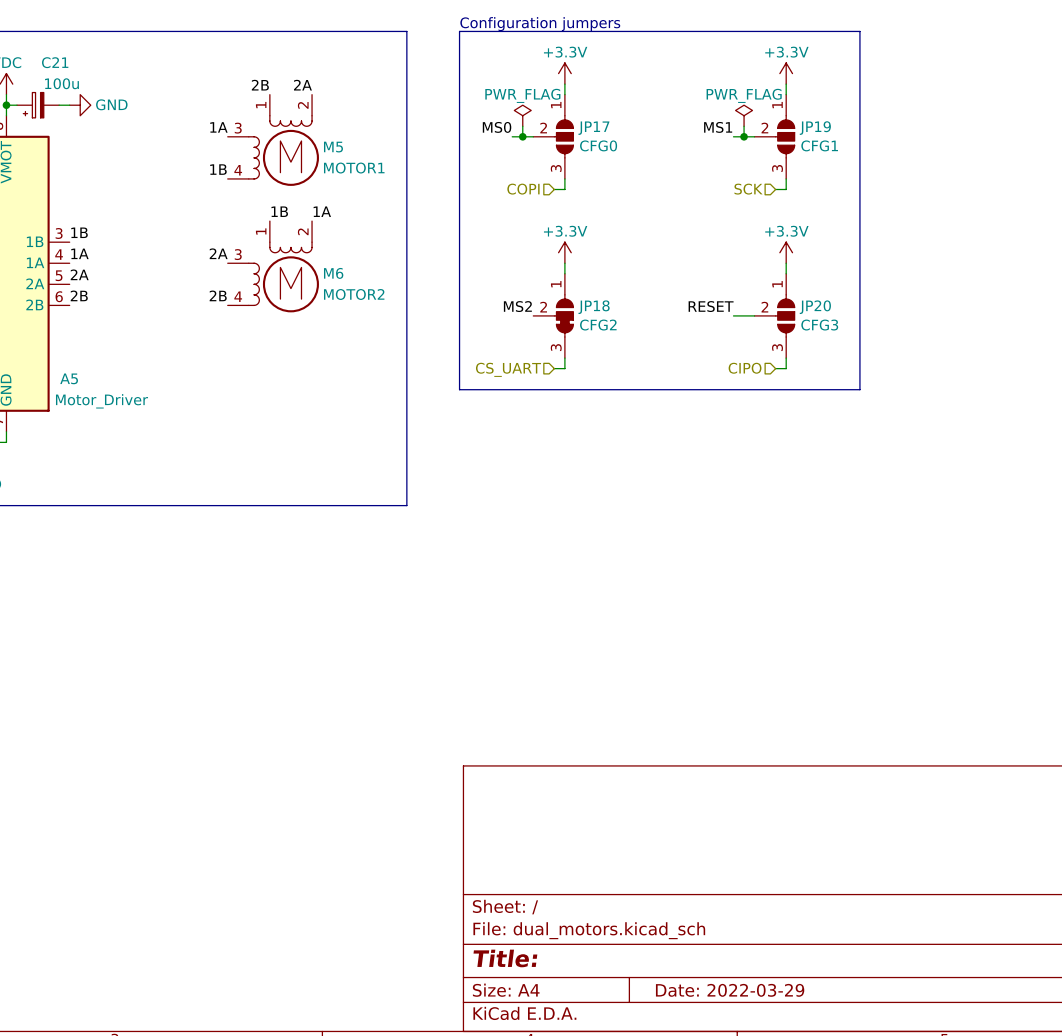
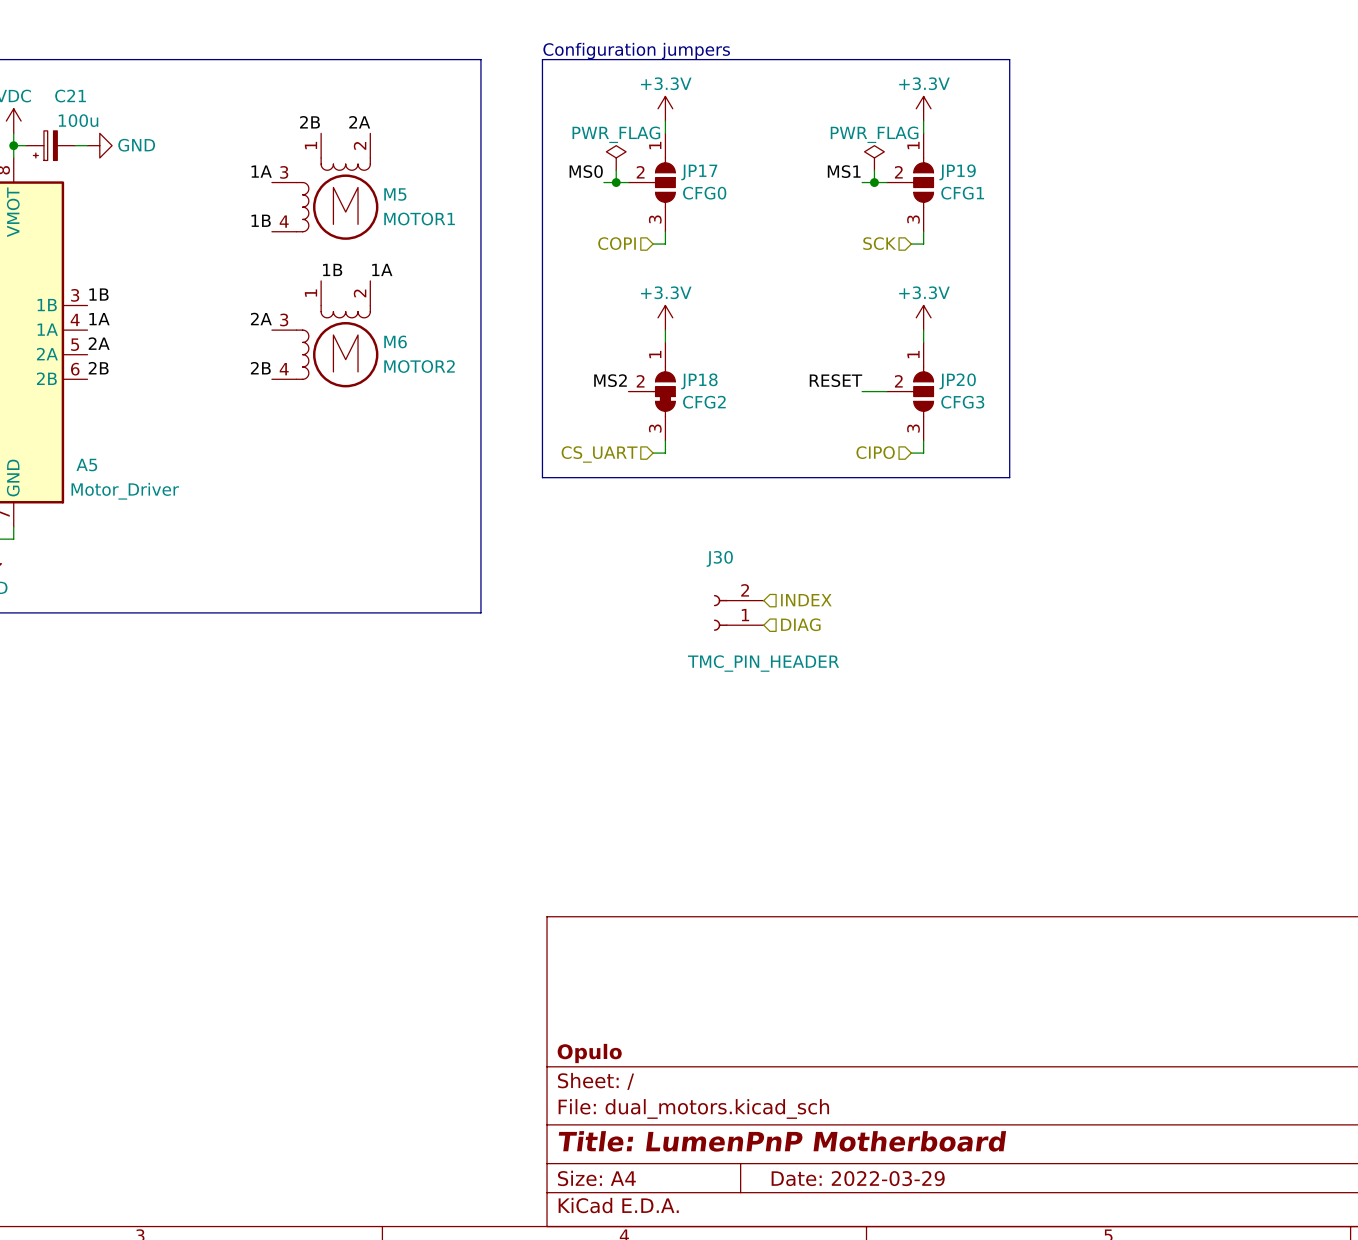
hierarchical label: none -> INDEX (806, 600)
J30: none -> TMC_PIN_HEADER (738, 612)
hierarchical label: none -> DIAG (800, 624)
title block: none -> Opulo (589, 1053)
title block: Title: (505, 958) -> Title: LumenPnP Motherboard (782, 1141)

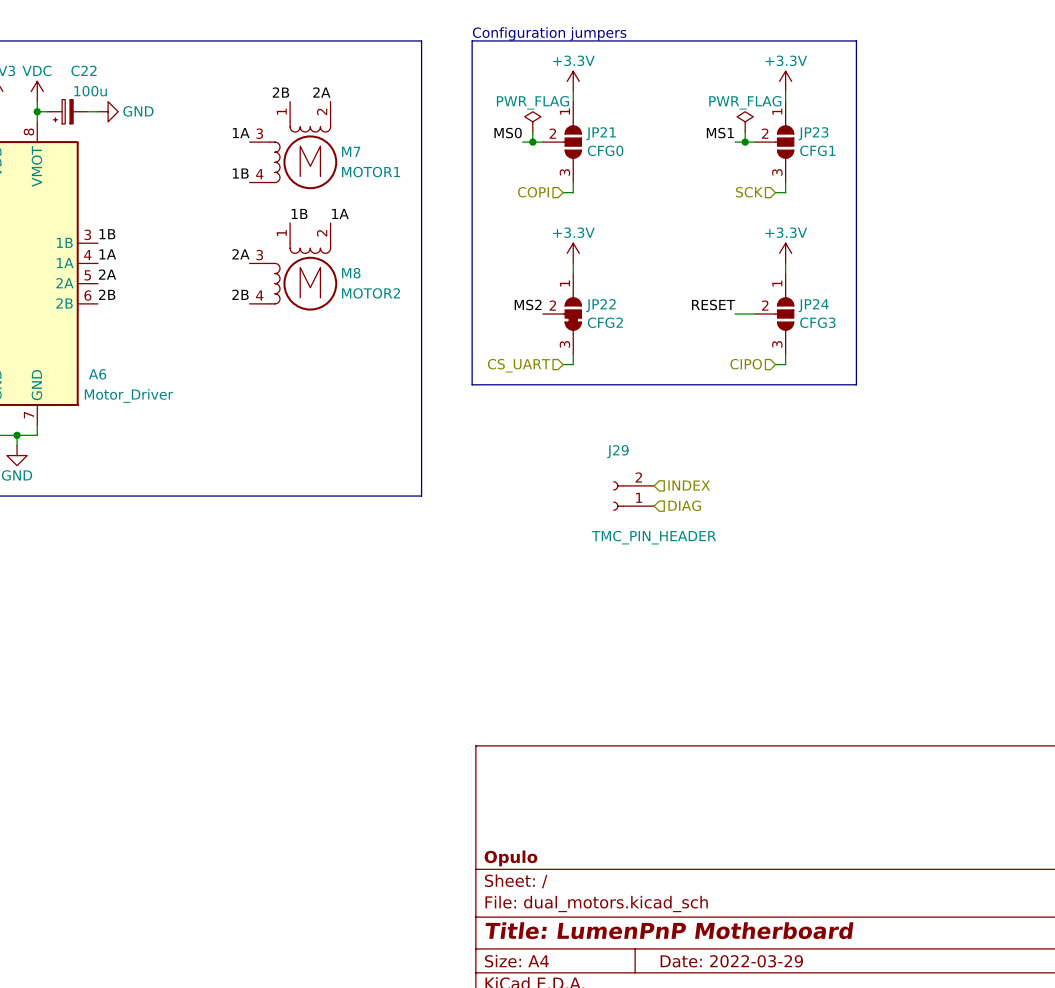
C21 name: C21 (70, 96) -> C22 (83, 70)
JP17 name: JP17 (699, 172) -> JP21 (601, 133)
JP19 name: JP19 (957, 172) -> JP23 (813, 133)
M5 name: M5 (395, 194) -> M7 (351, 151)
M6 name: M6 (395, 341) -> M8 (351, 273)
JP18 name: JP18 (699, 381) -> JP22 (601, 305)
JP20 name: JP20 (957, 381) -> JP24 (813, 305)
A5 name: A5 (86, 465) -> A6 (97, 374)
J30 name: J30 (719, 558) -> J29 (617, 451)

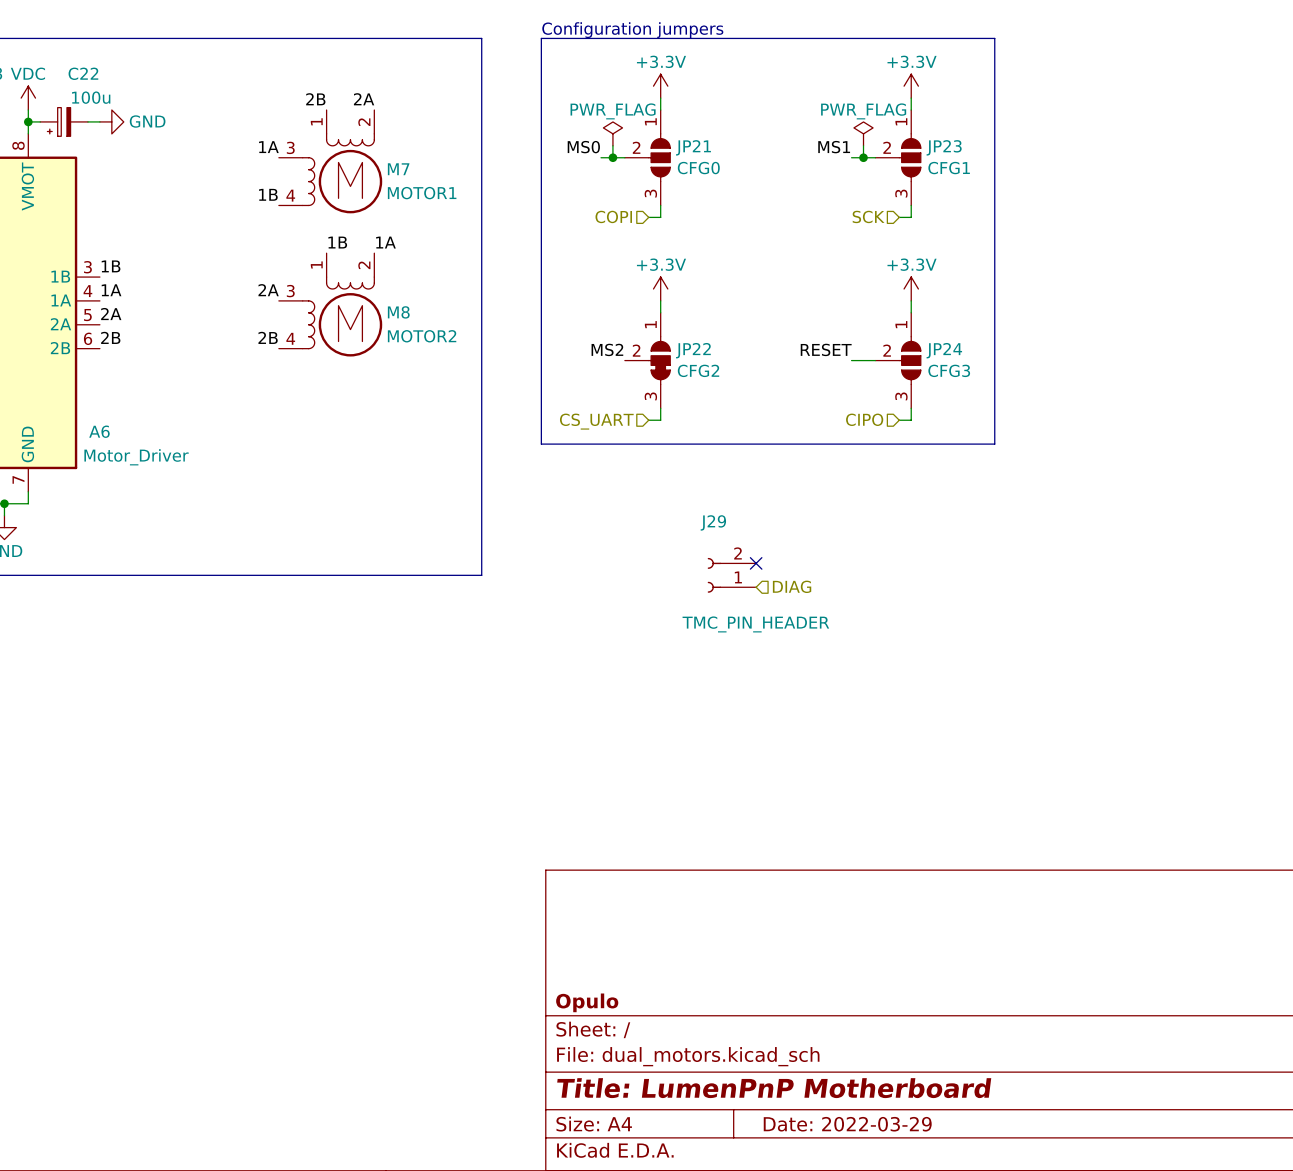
no-connect mark: none -> (756, 563)
hierarchical label: INDEX (689, 485) -> none

